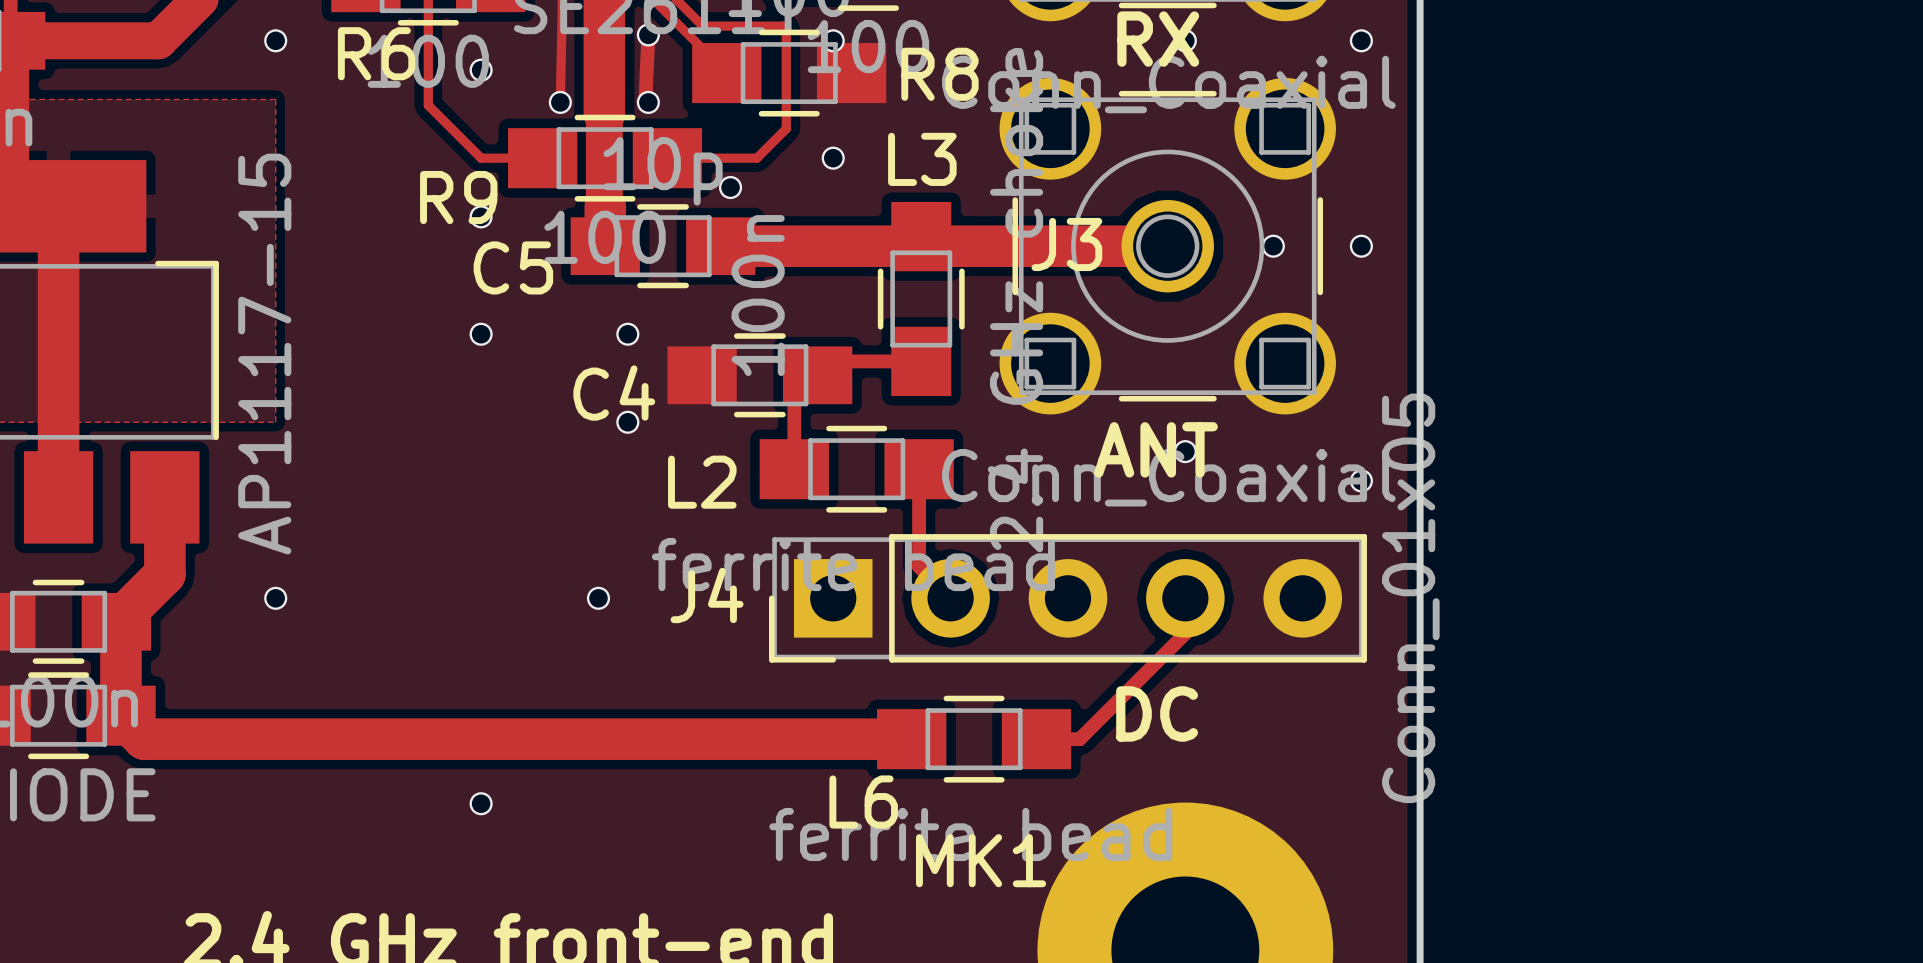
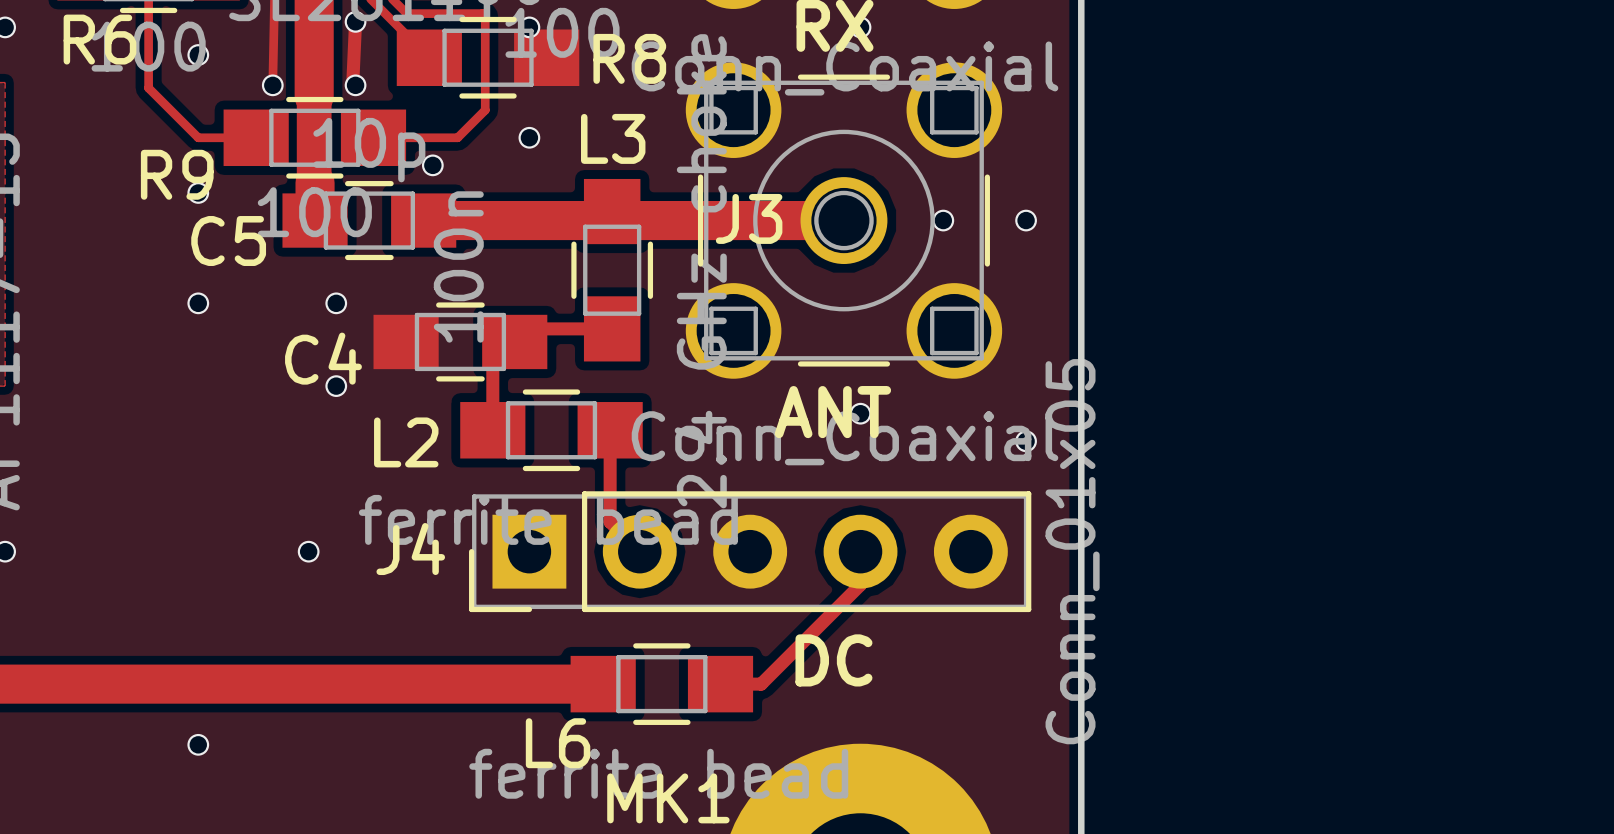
via: (1361, 40) -> none

